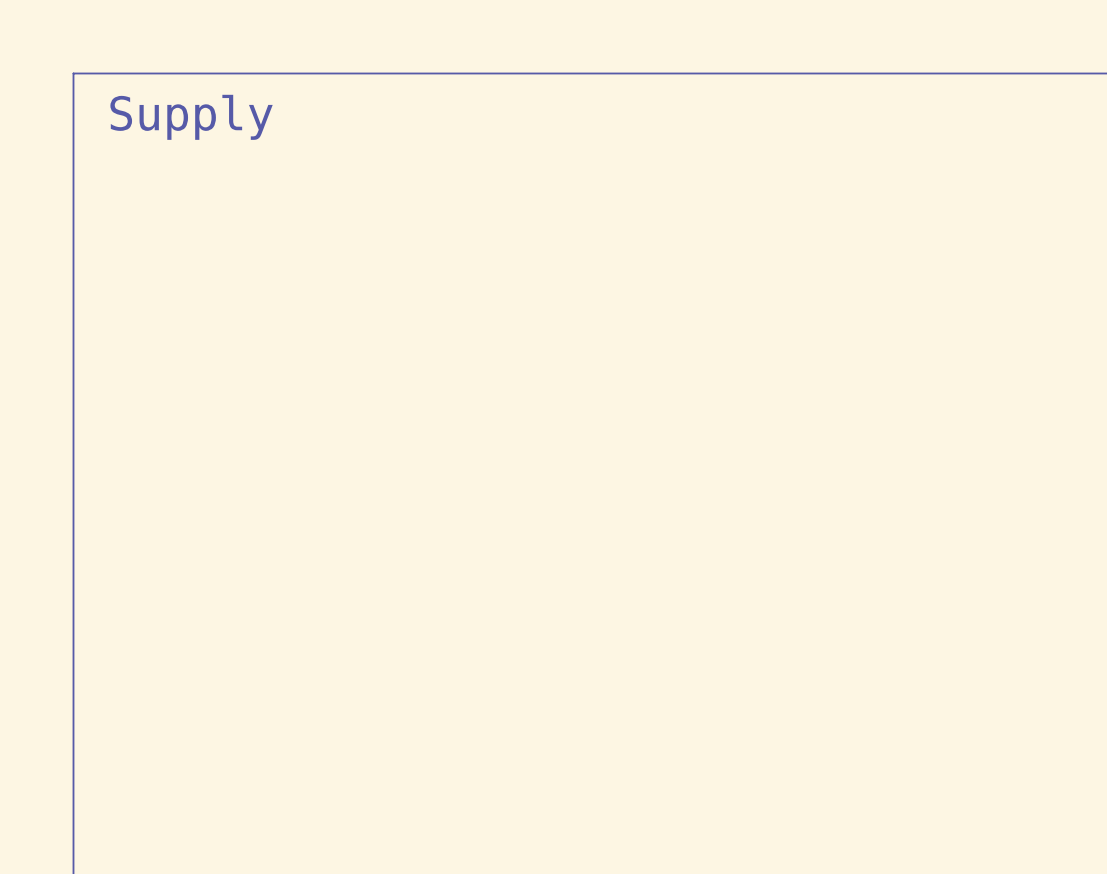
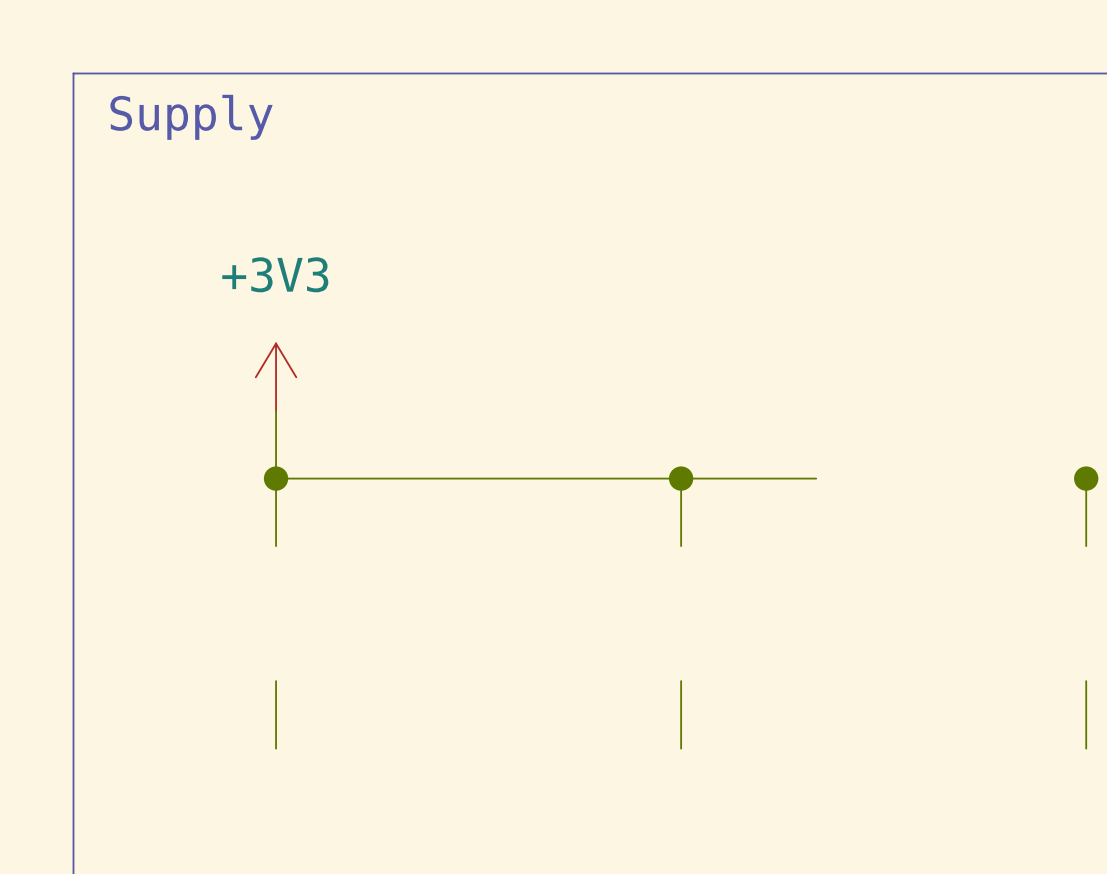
power symbol: none -> +3V3 (276, 377)
wire: none -> (276, 411) (276, 546)
wire: none -> (276, 478) (816, 478)
junction: none -> (276, 478)
wire: none -> (681, 478) (681, 546)
junction: none -> (681, 478)
wire: none -> (1086, 478) (1086, 546)
junction: none -> (1086, 478)
wire: none -> (276, 681) (276, 748)
wire: none -> (681, 681) (681, 748)
wire: none -> (1086, 681) (1086, 748)

